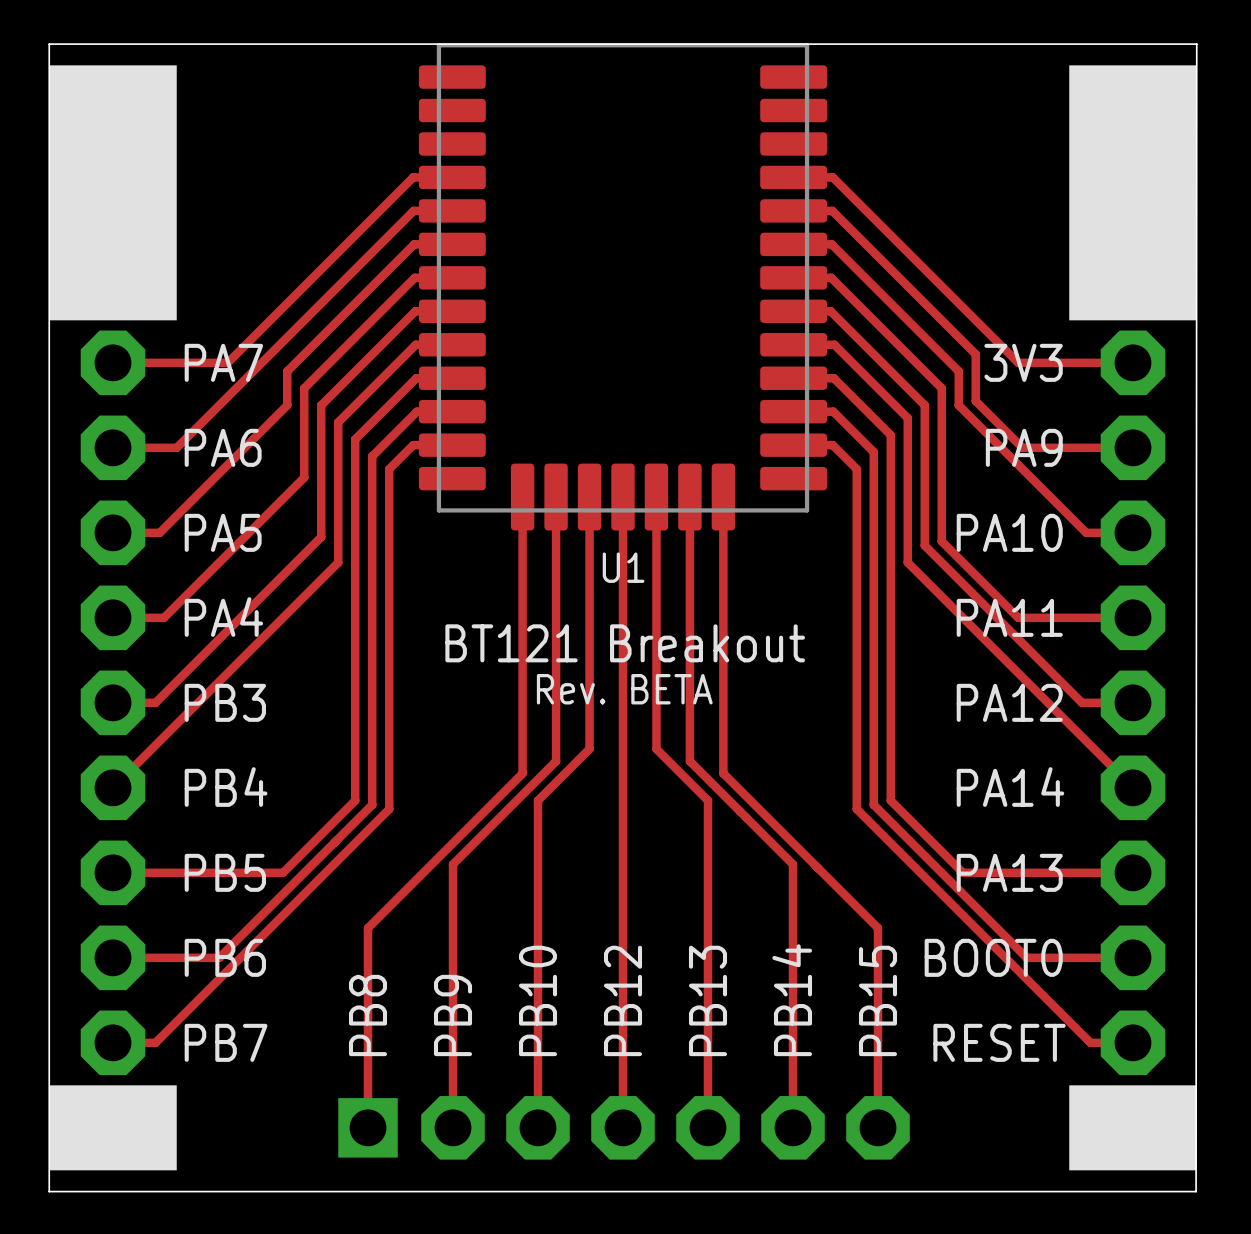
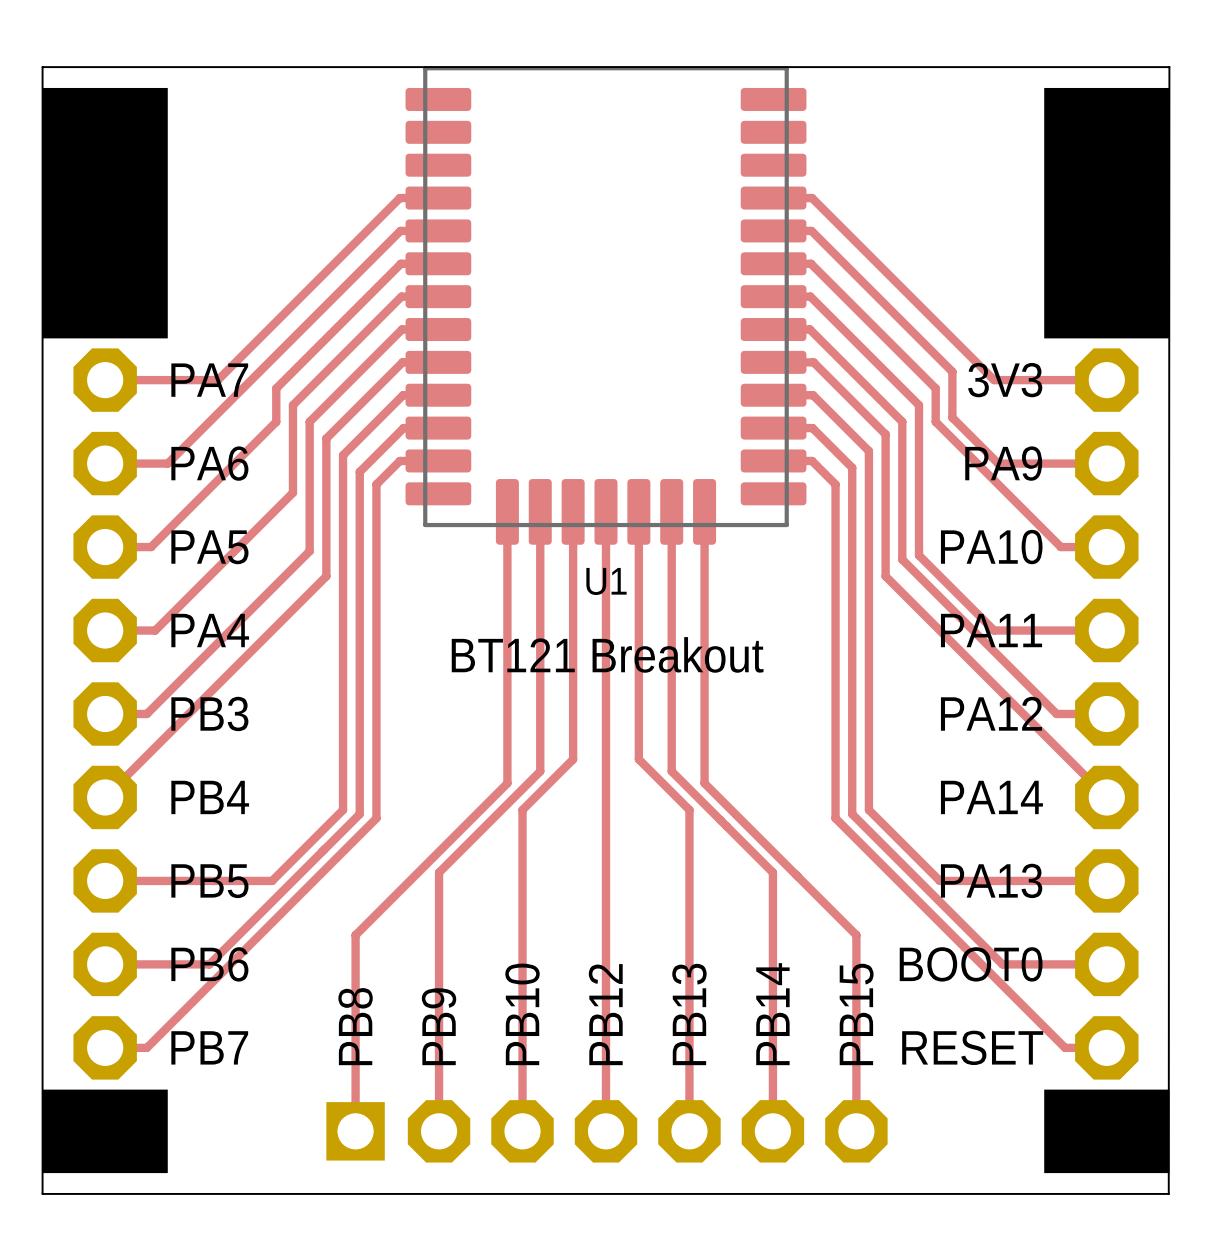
text: Rev. BETA (624, 689) -> none

